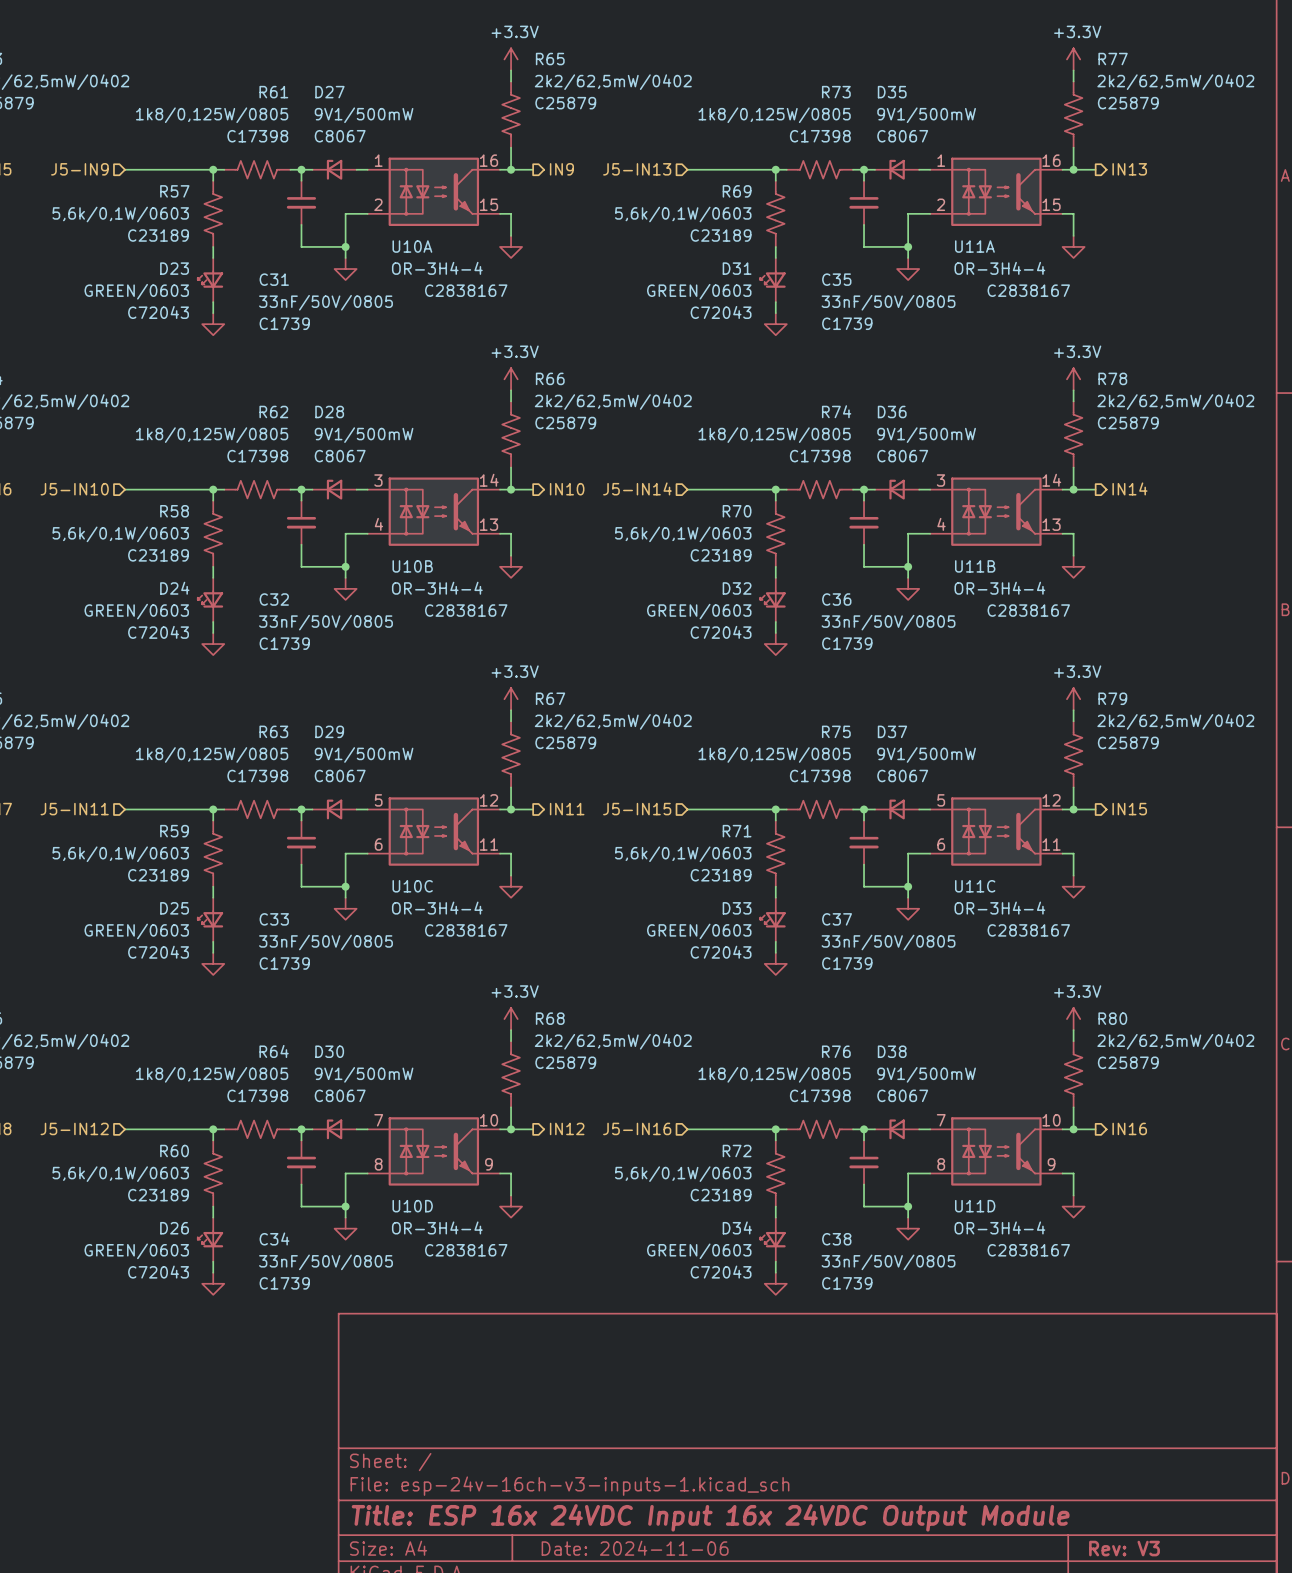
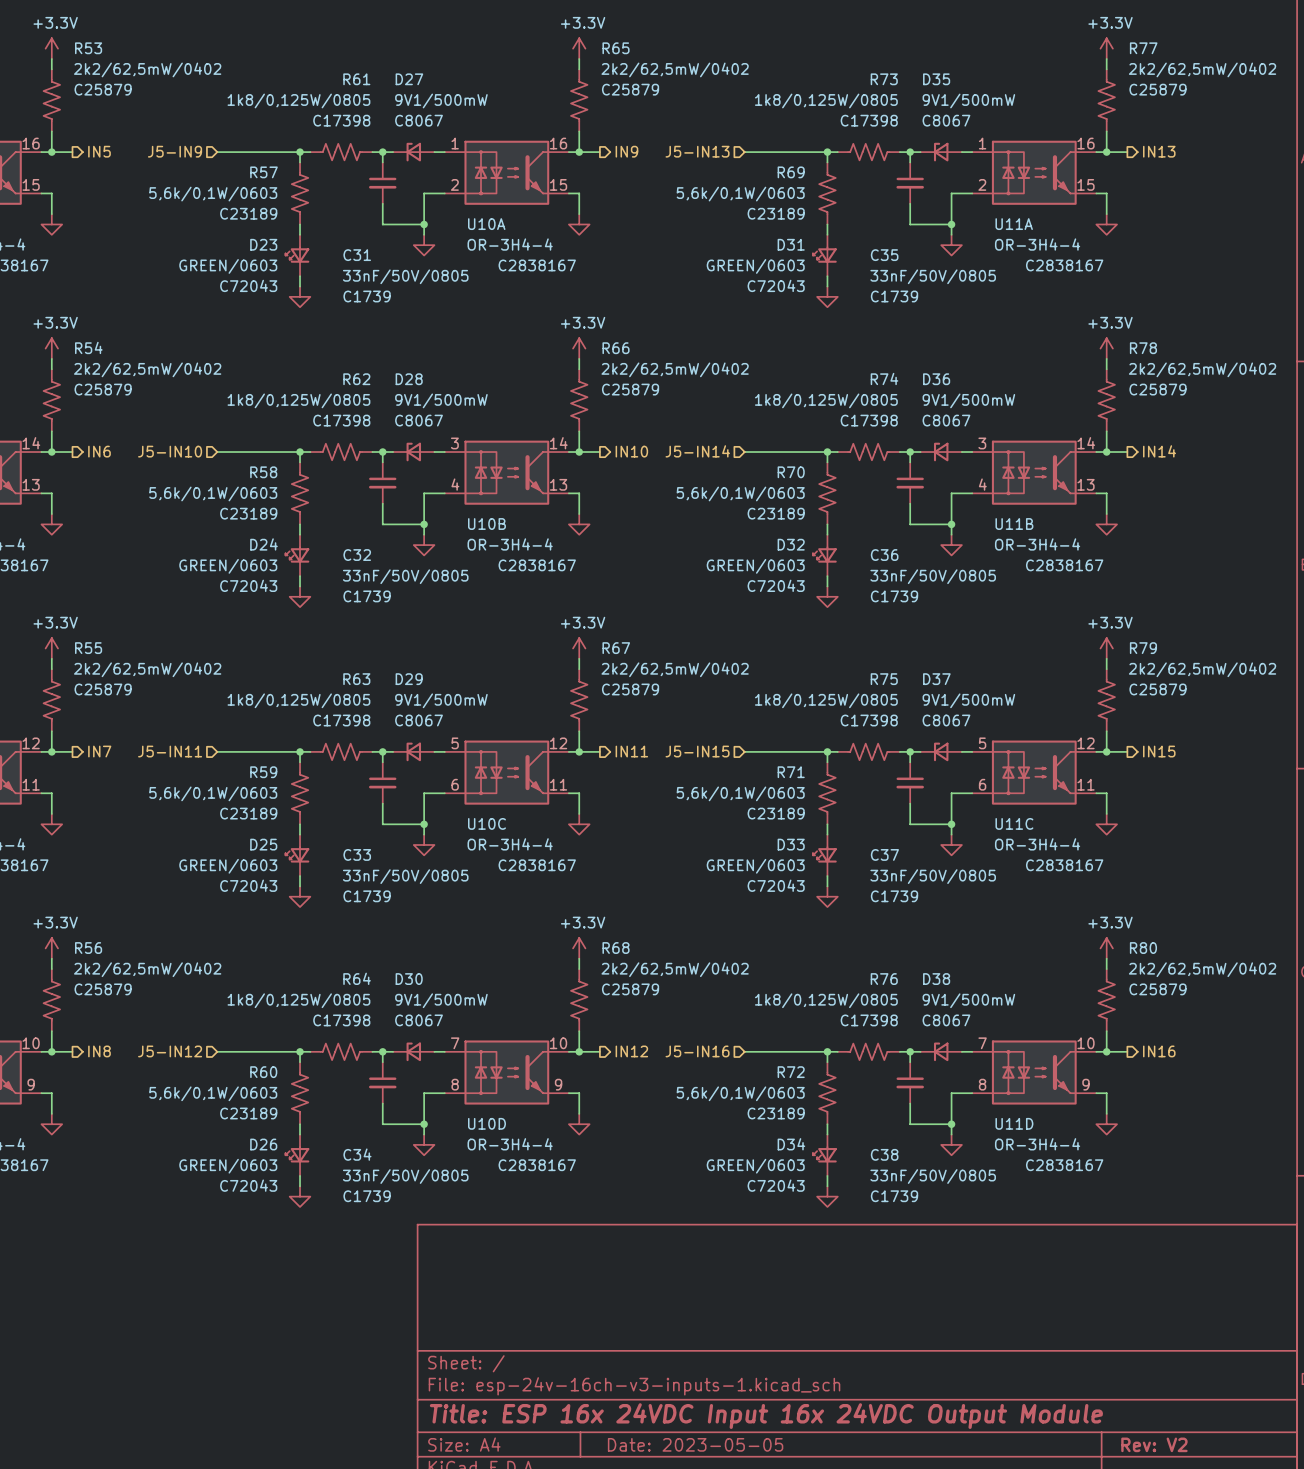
title block: Date: 2024-11-06 (635, 1548) -> Date: 2023-05-05 (695, 1444)
title block: Rev: V3 (1124, 1548) -> Rev: V2 (1154, 1444)

